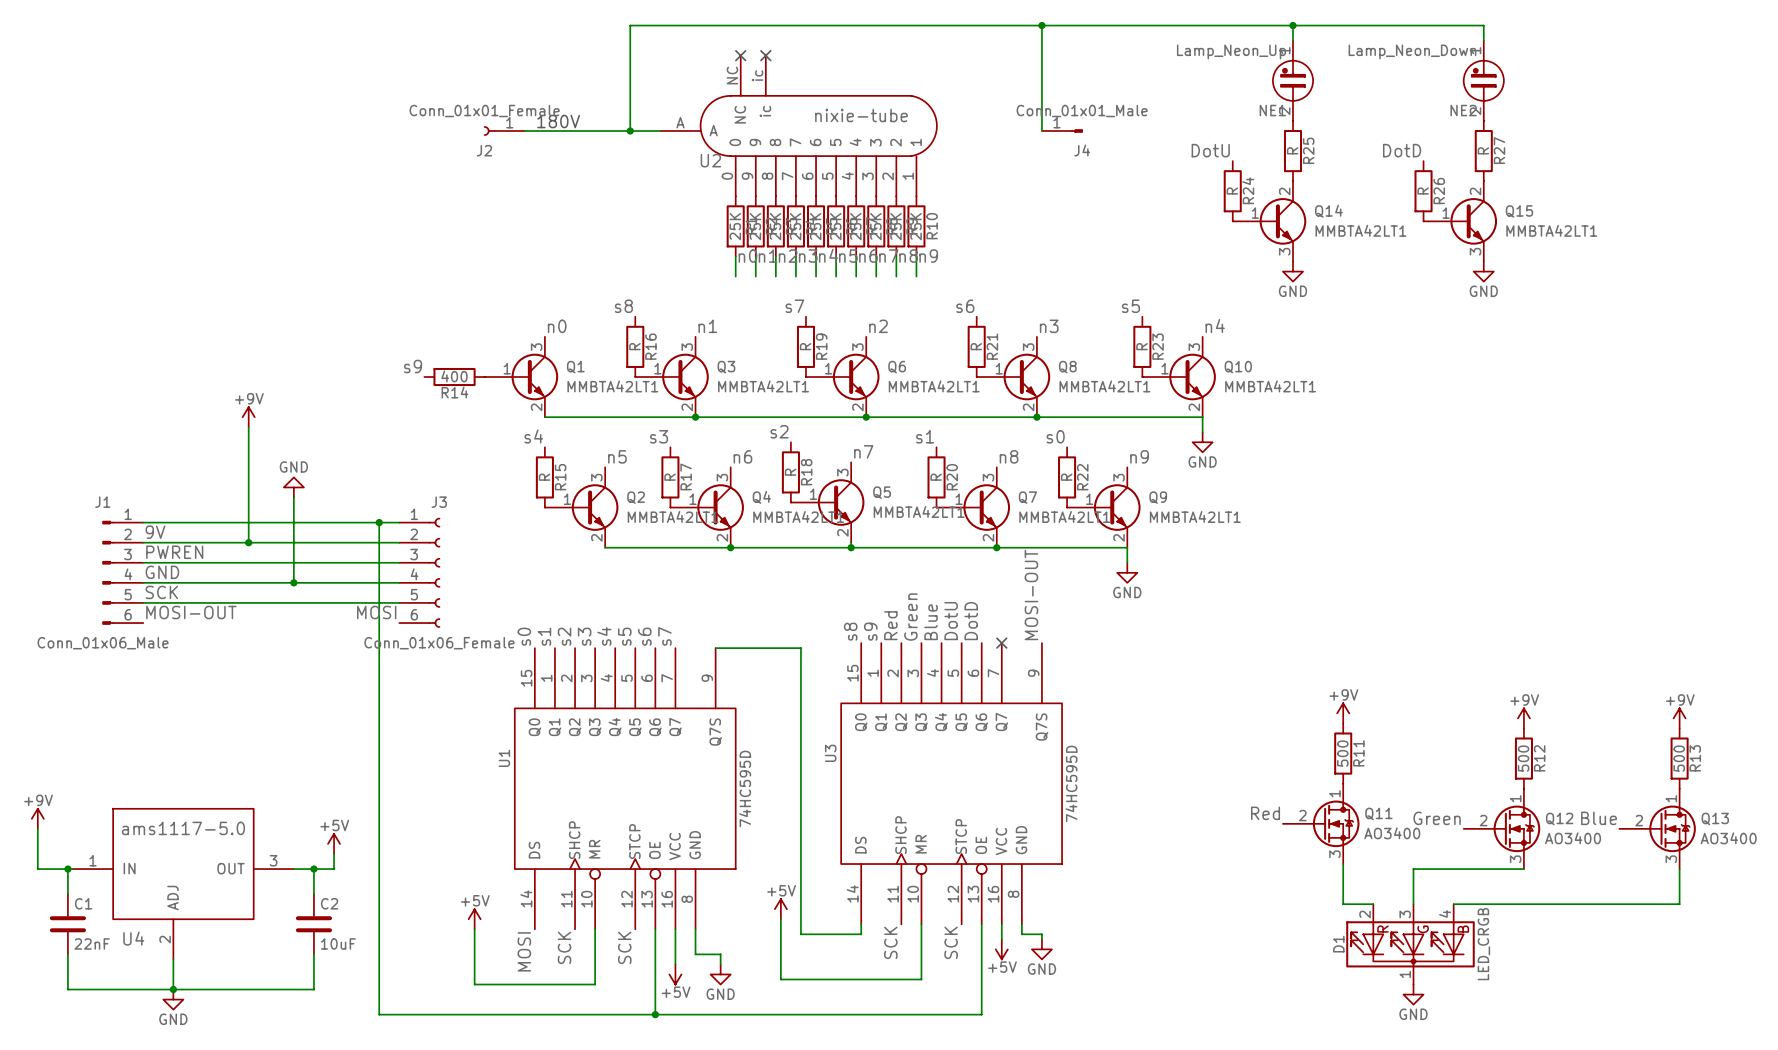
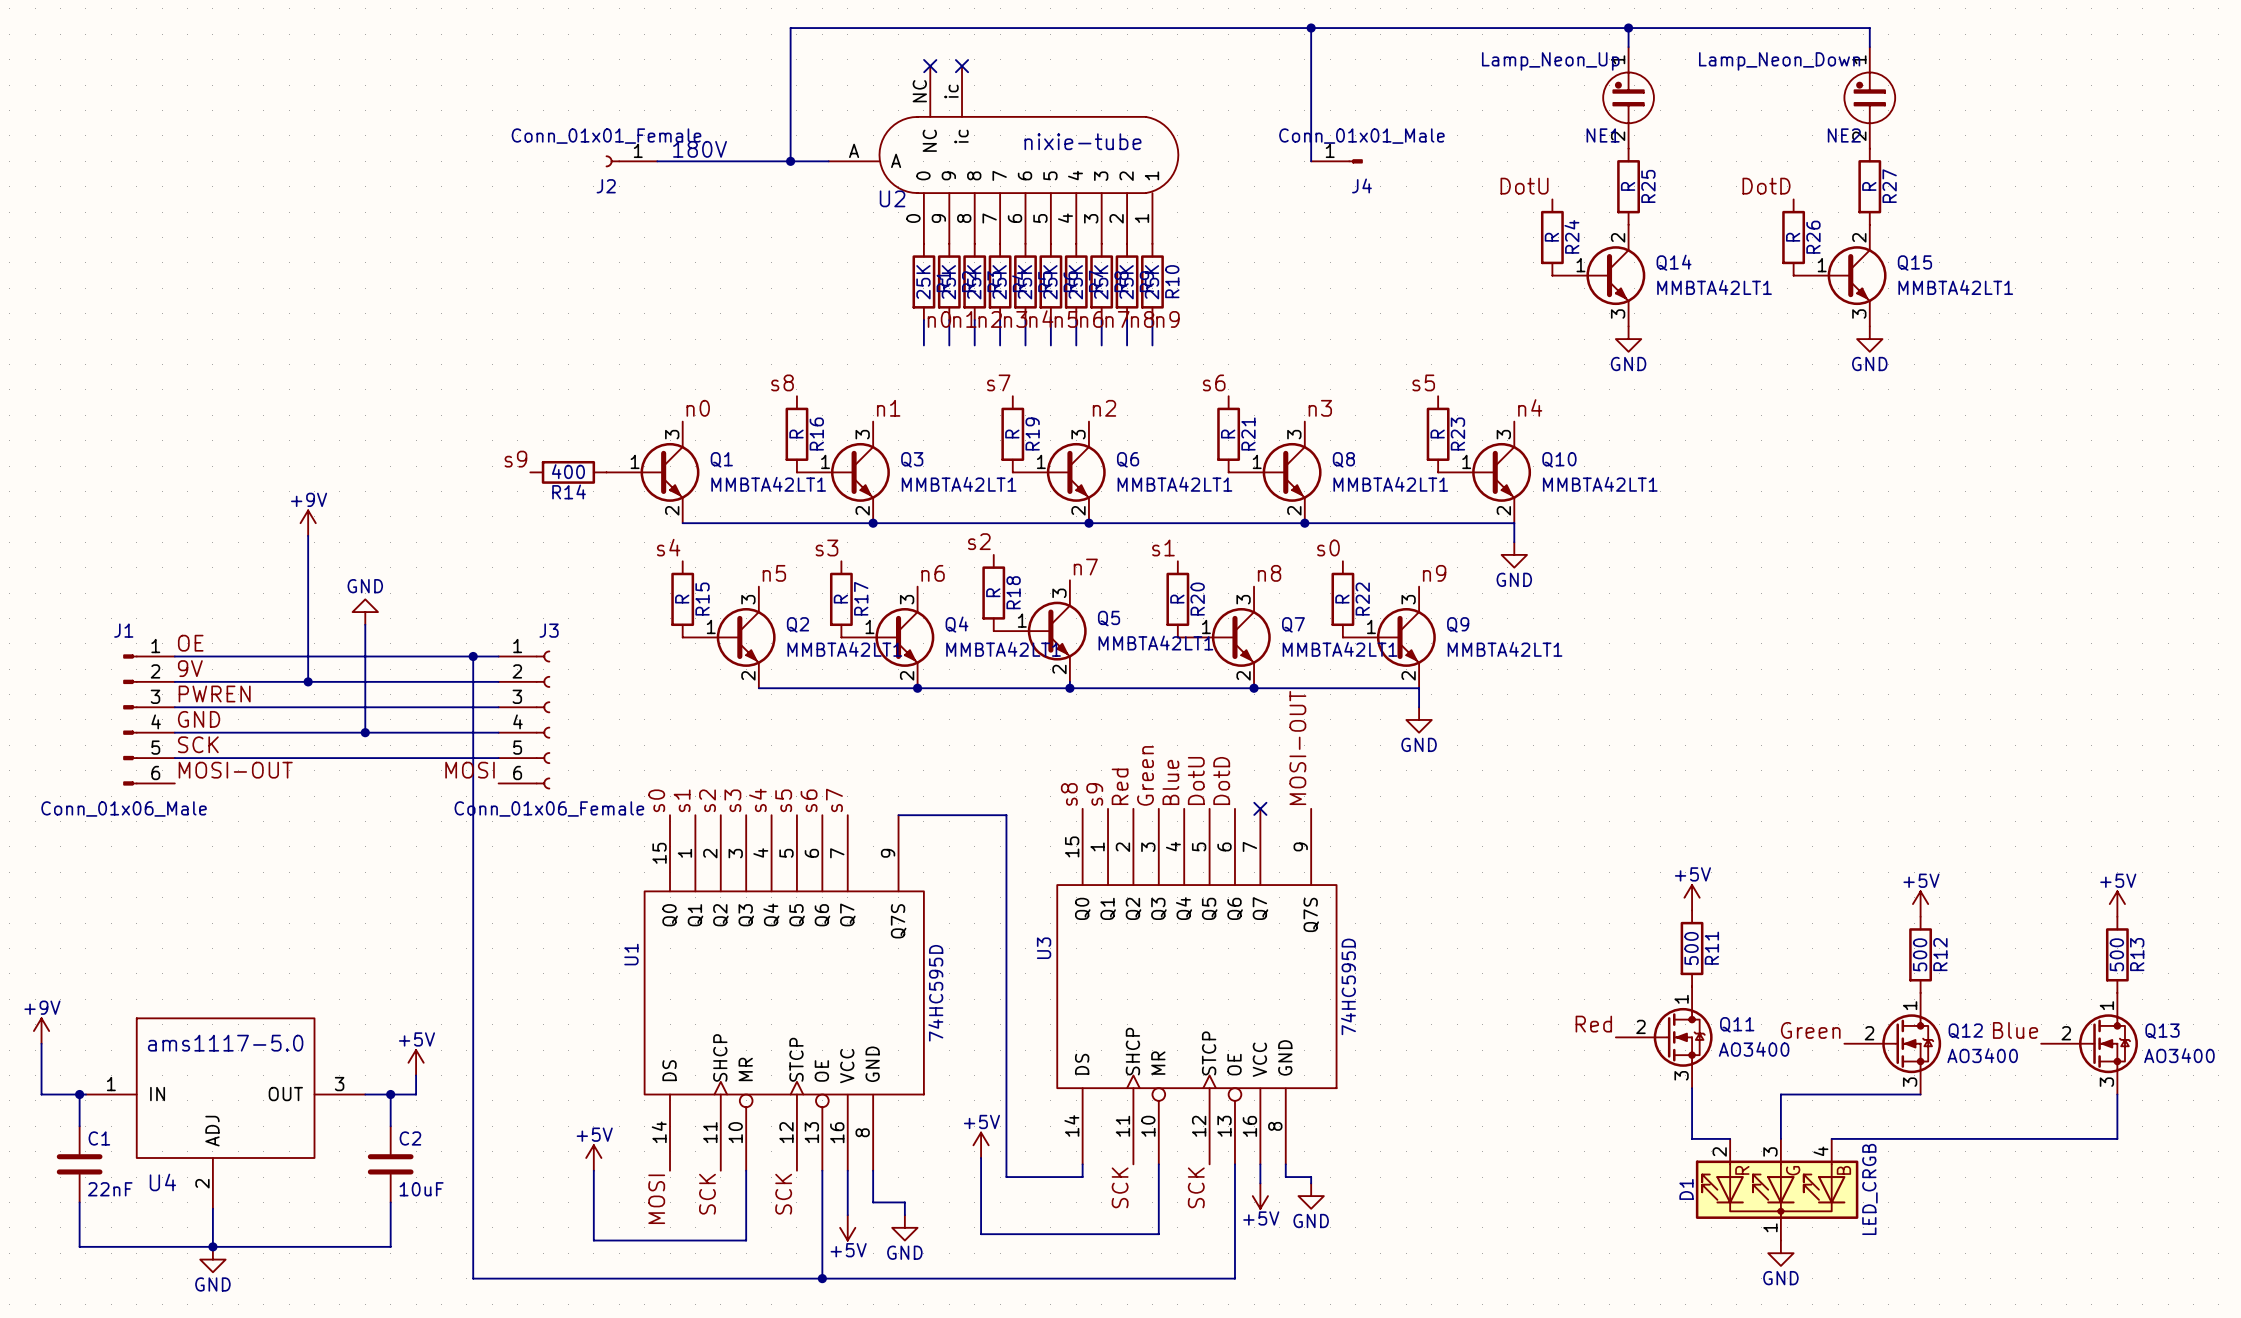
label: none -> OE (190, 643)
power symbol: +9V (1343, 713) -> +5V (1692, 897)
power symbol: +9V (1523, 718) -> +5V (1920, 904)
power symbol: +9V (1679, 718) -> +5V (2117, 904)

